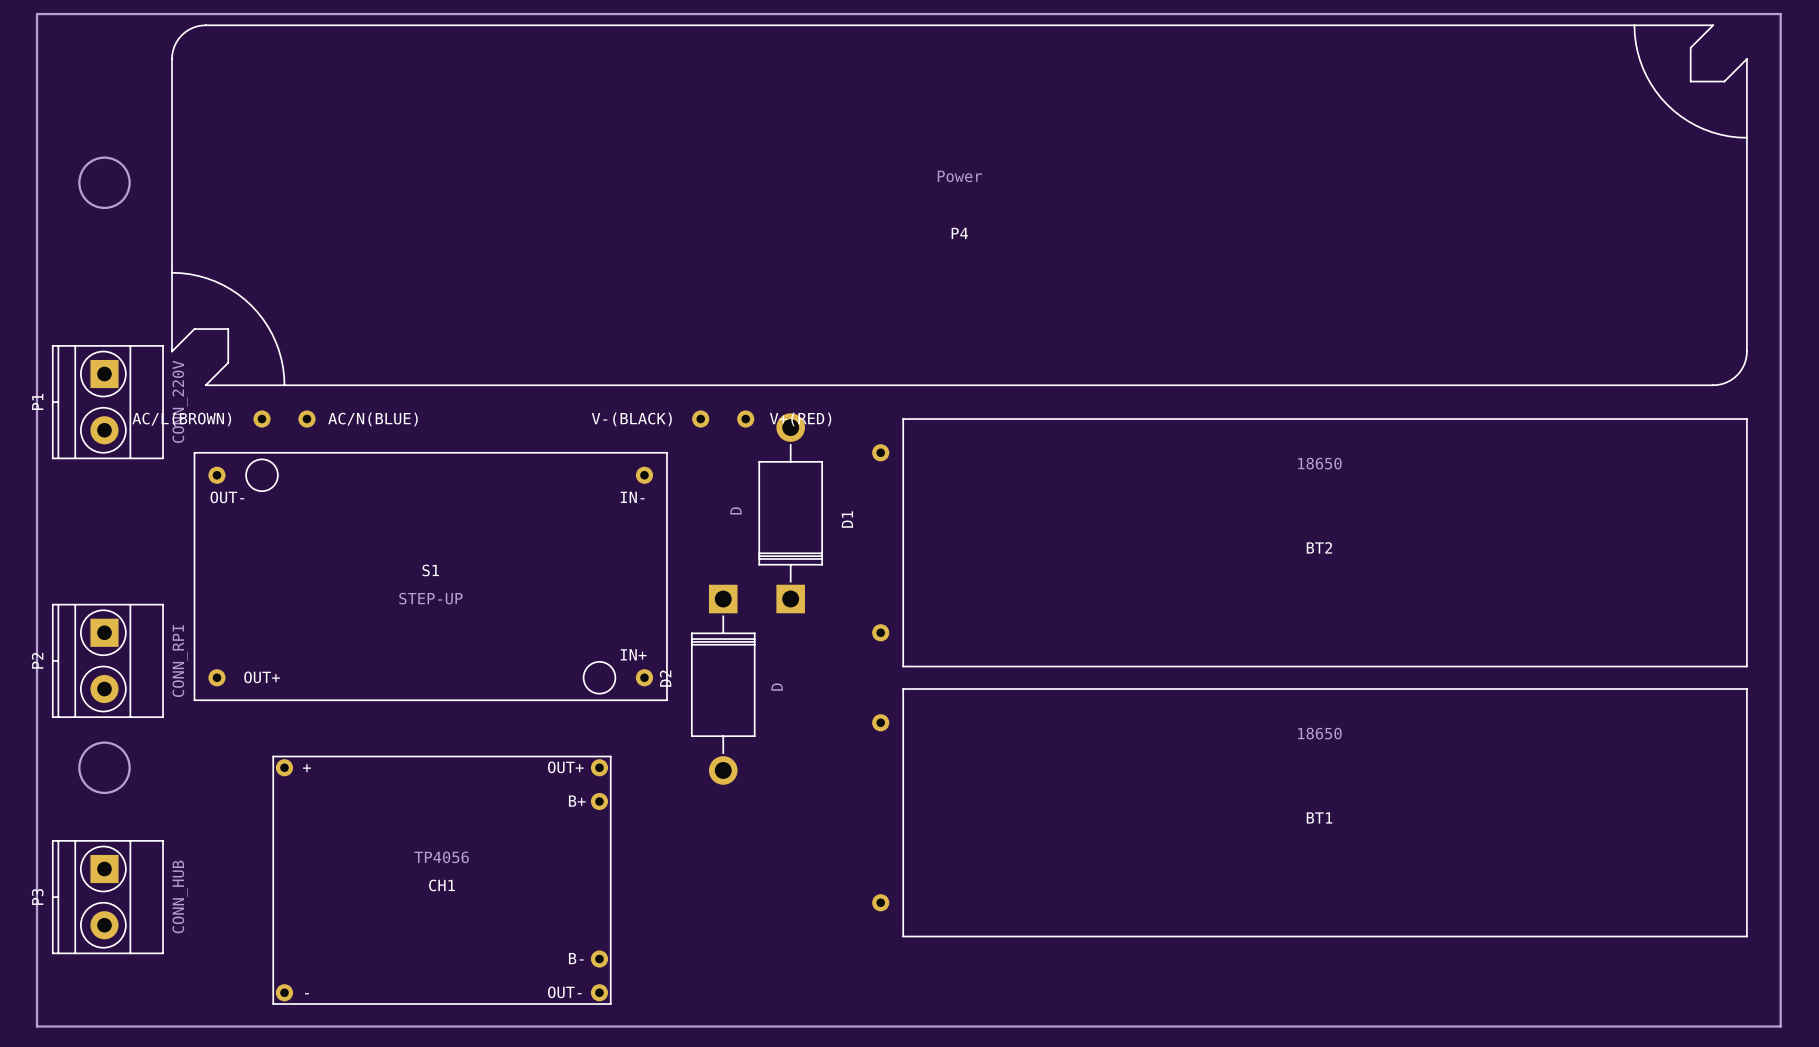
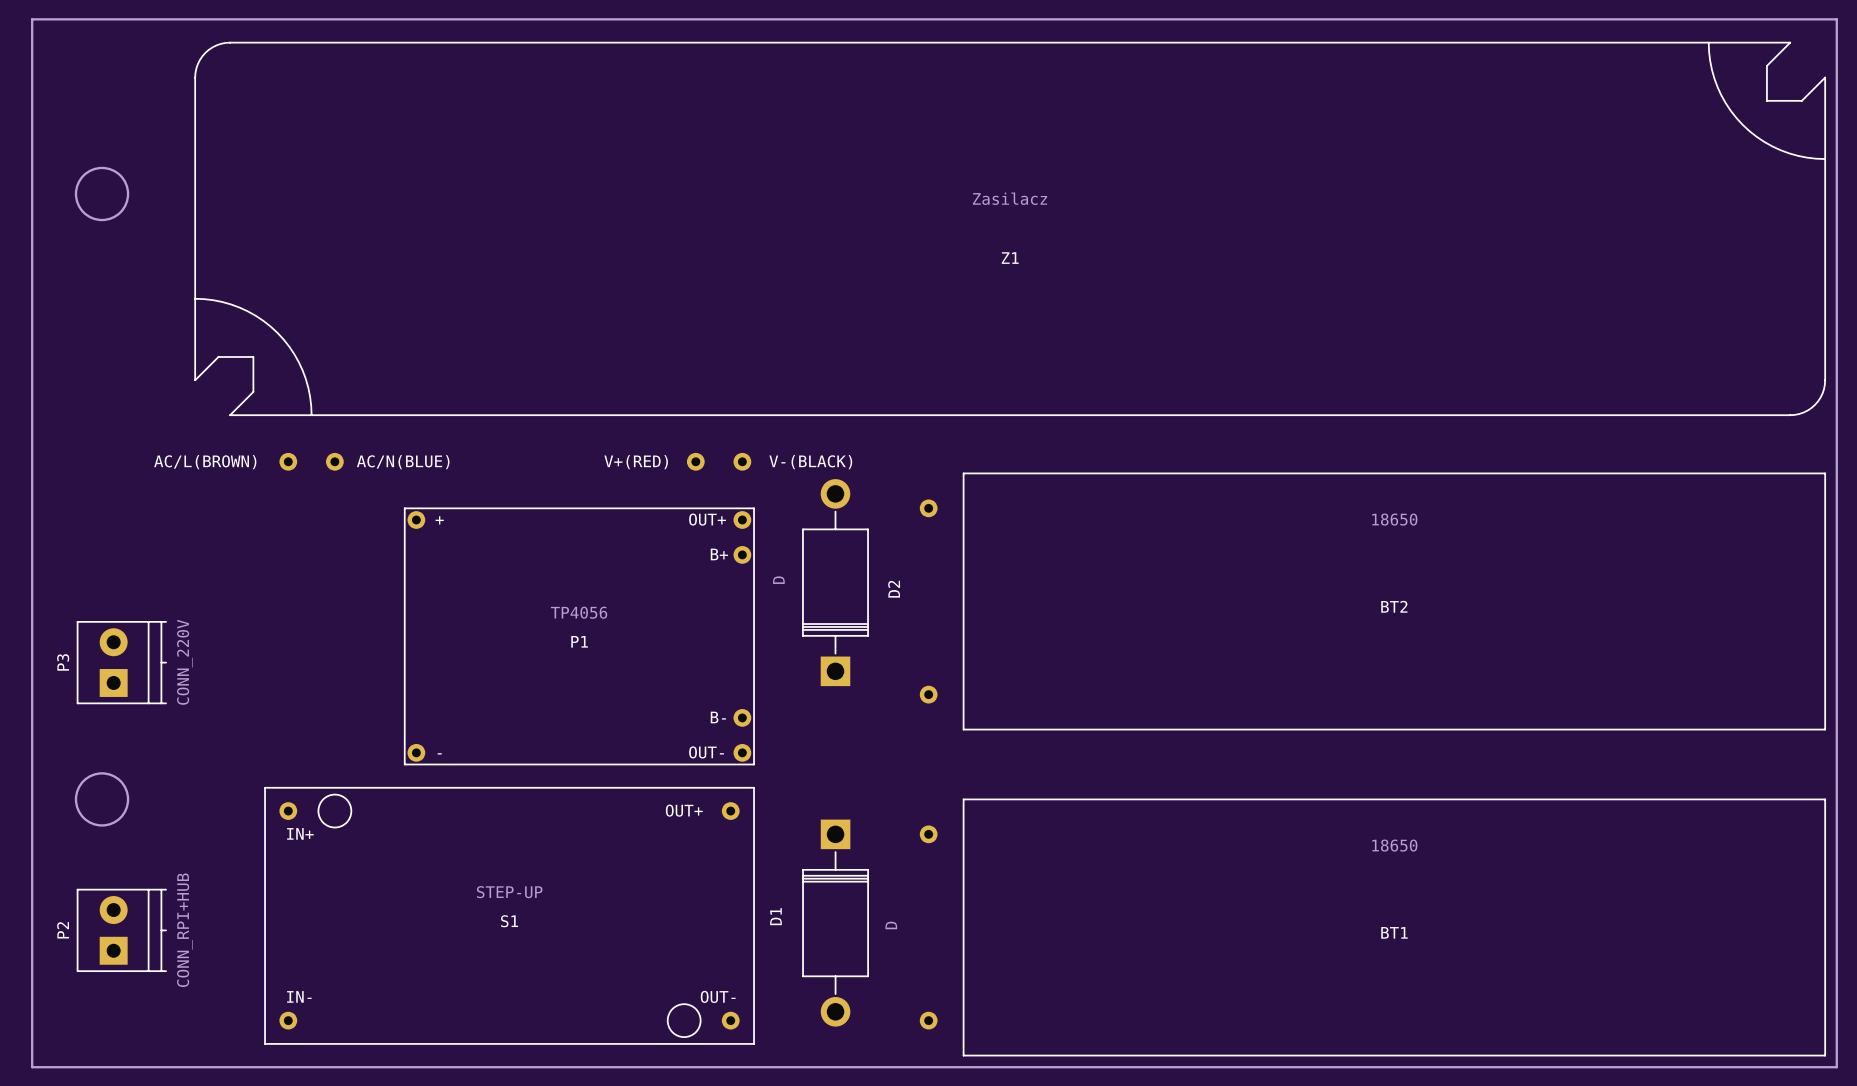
P4: Power (959, 226) -> none
Z1: none -> Zasilacz (1010, 256)
P1 footprint: [51, 345, 164, 460] -> [403, 507, 755, 766]
P1 name position: P1 (37, 401) -> P1 (579, 641)
P1 value: CONN_220V (180, 401) -> TP4056 (579, 612)
BT2 footprint: [872, 418, 1748, 668] -> [919, 472, 1827, 731]
D1 rotation: 0° (790, 513) -> 180° (835, 923)
D1 position: (790, 513) -> (835, 923)
S1 rotation: 0° (430, 576) -> 180° (509, 915)
S1 position: (430, 576) -> (509, 915)
P2 footprint: [51, 603, 164, 718] -> [76, 888, 167, 973]
P2 value: CONN_RPI (180, 661) -> CONN_RPI+HUB (184, 930)
D2 rotation: 0° (723, 684) -> 180° (835, 582)
D2 position: (723, 684) -> (835, 582)
BT1 footprint: [872, 688, 1748, 938] -> [919, 798, 1827, 1057]
P3 footprint: [51, 840, 164, 955] -> [76, 620, 167, 705]
CH1: TP4056 (441, 880) -> none
P3 value: CONN_HUB (180, 896) -> CONN_220V (184, 662)

